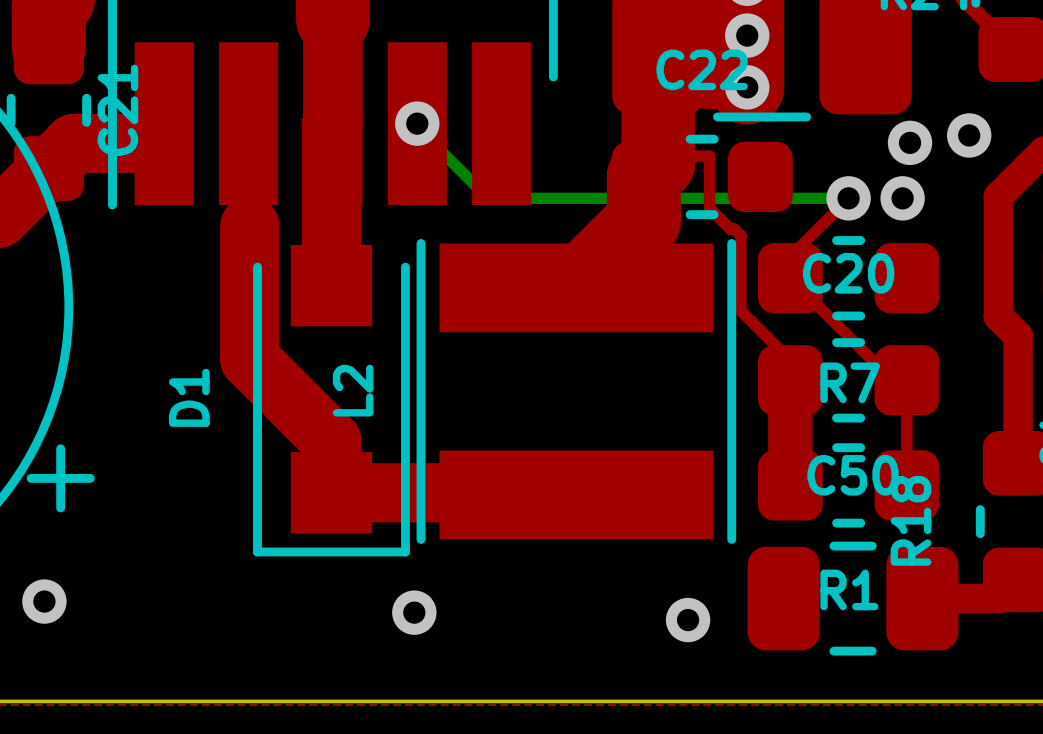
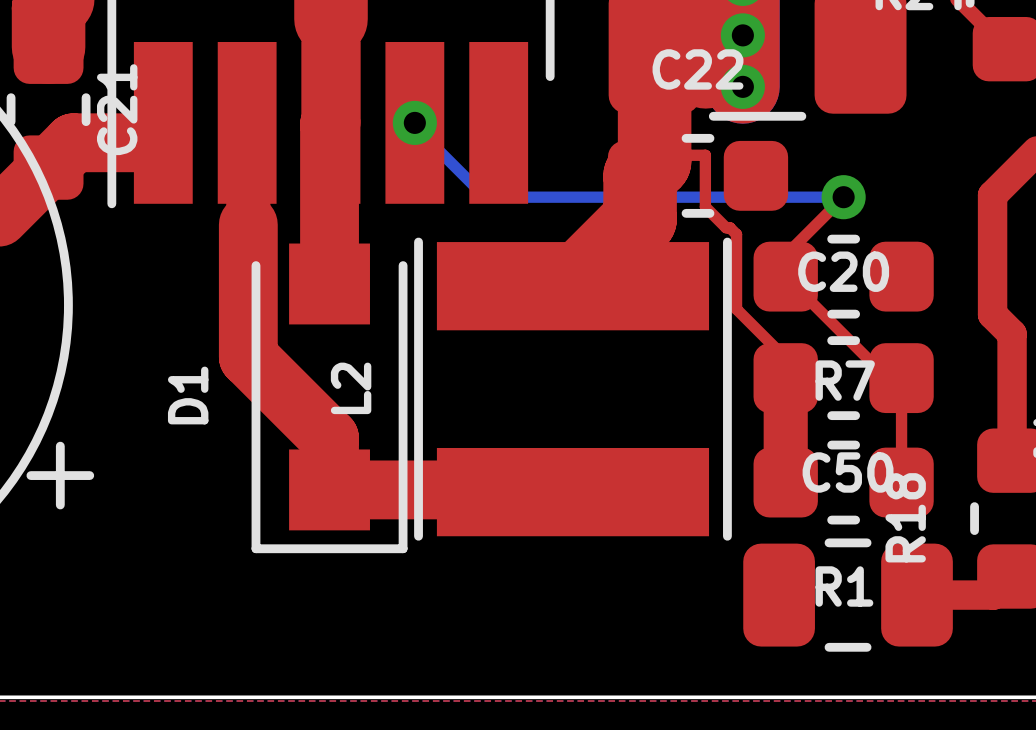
via: (969, 135) -> none
via: (910, 142) -> none
via: (902, 198) -> none
via: (44, 601) -> none
via: (414, 612) -> none
via: (688, 620) -> none

